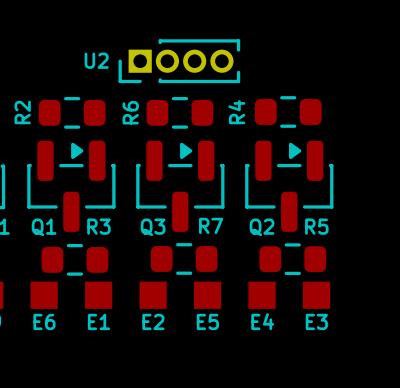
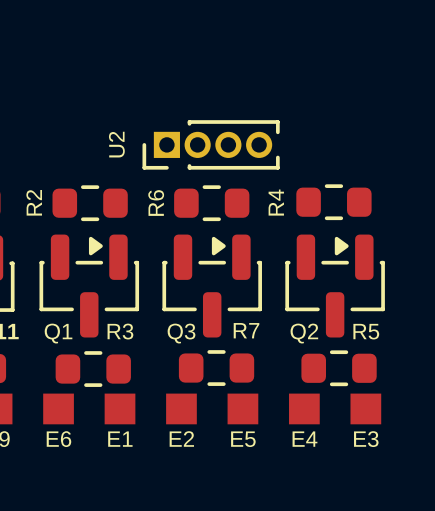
U2 name rotation: 0° (96, 60) -> 90° counterclockwise (116, 144)

